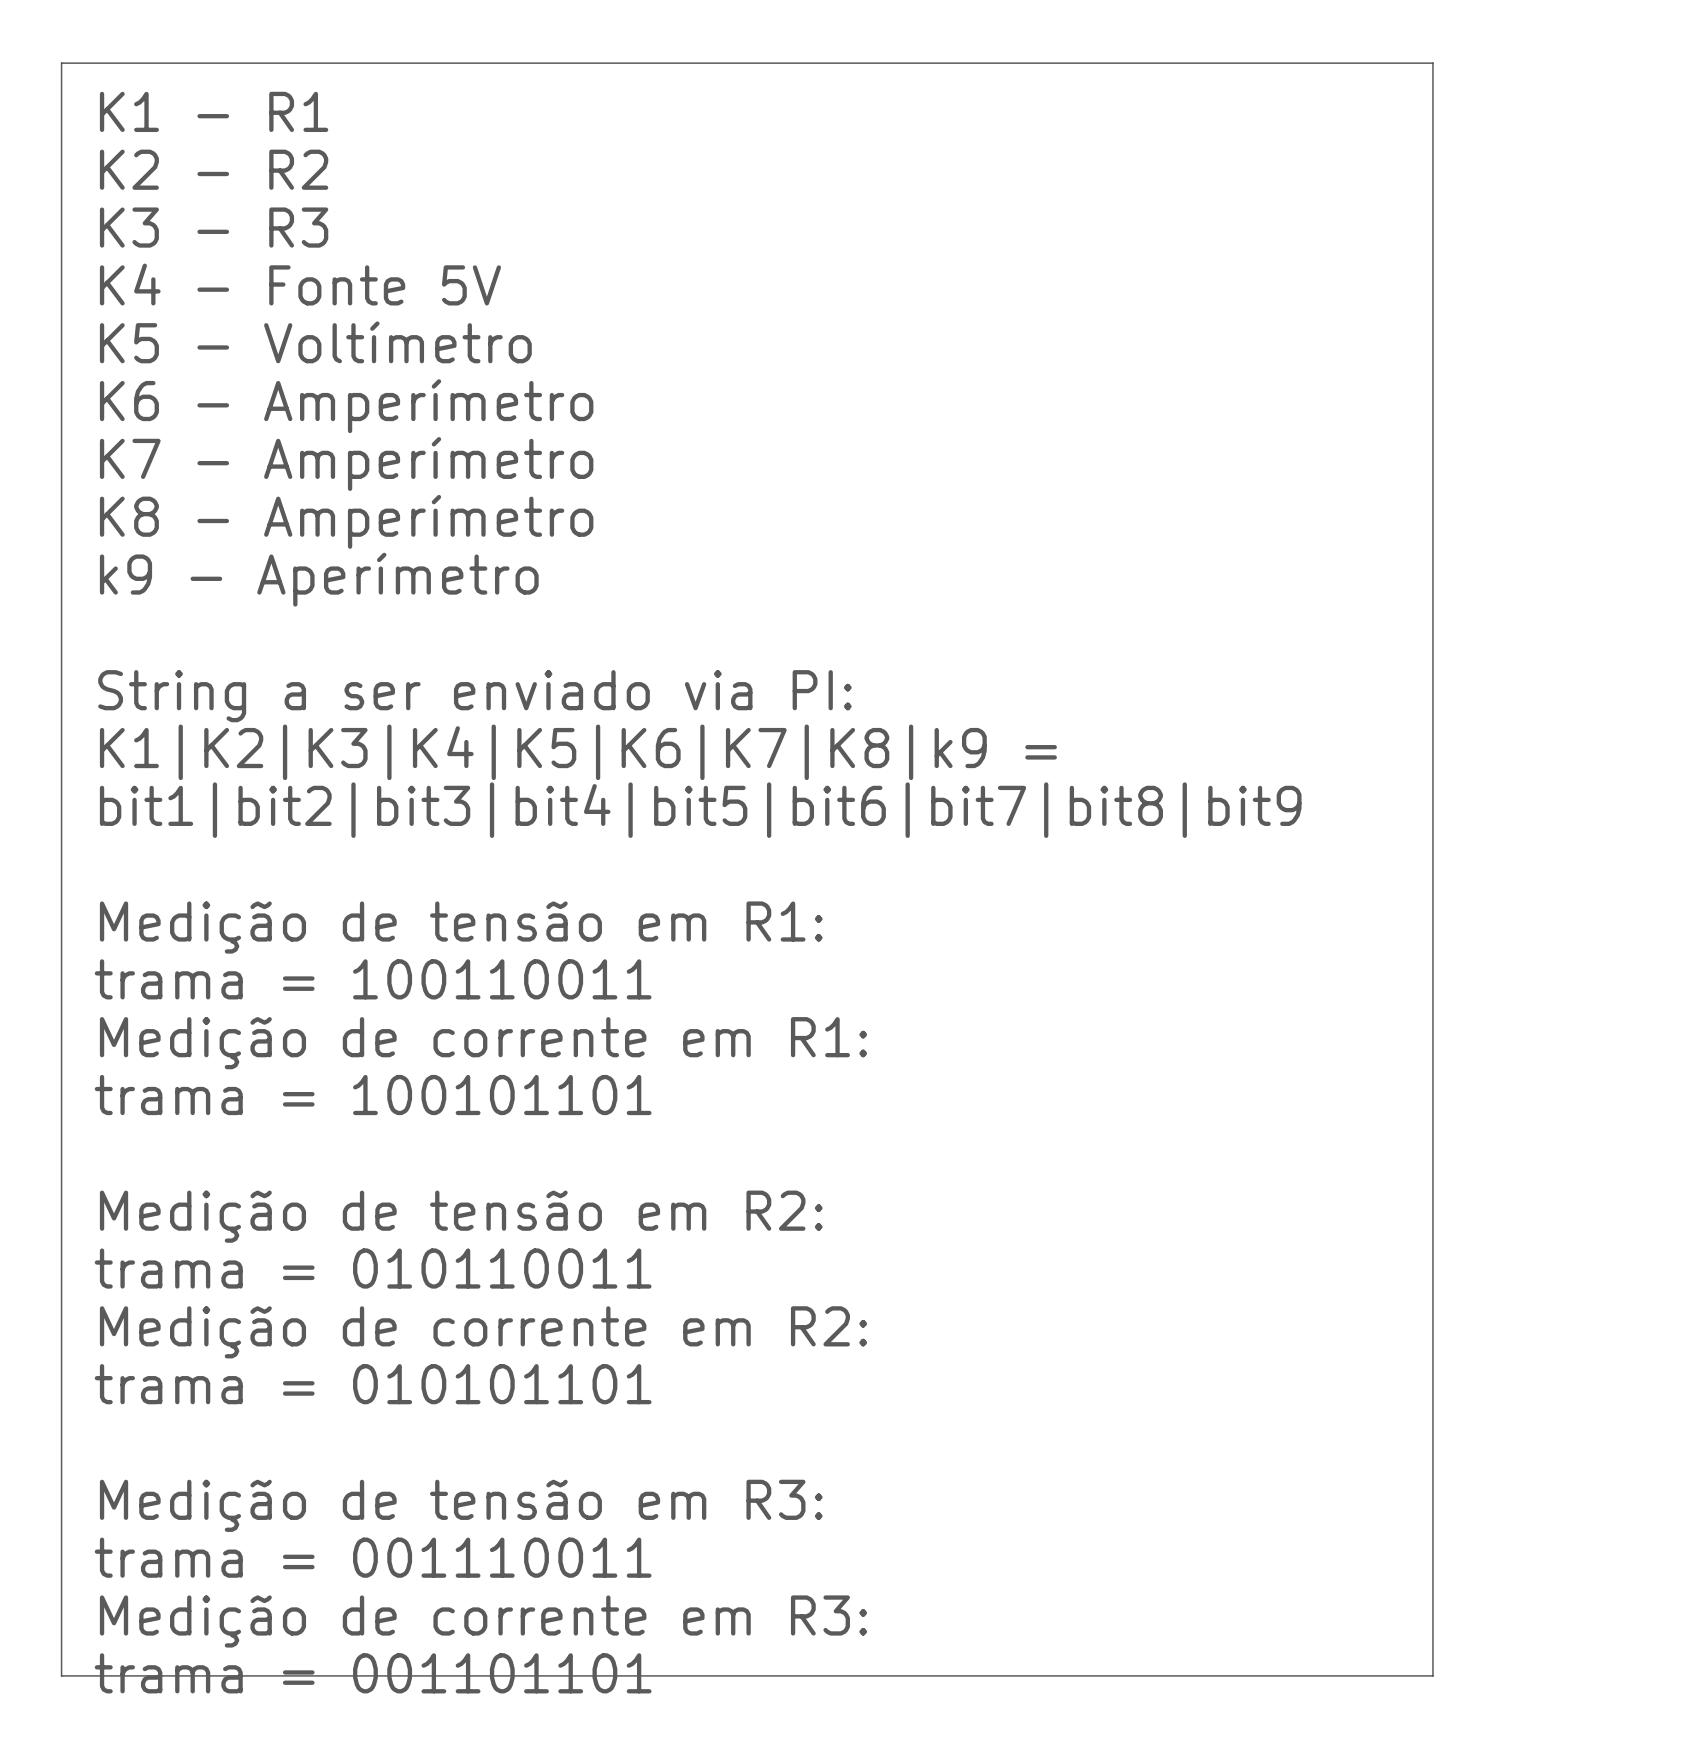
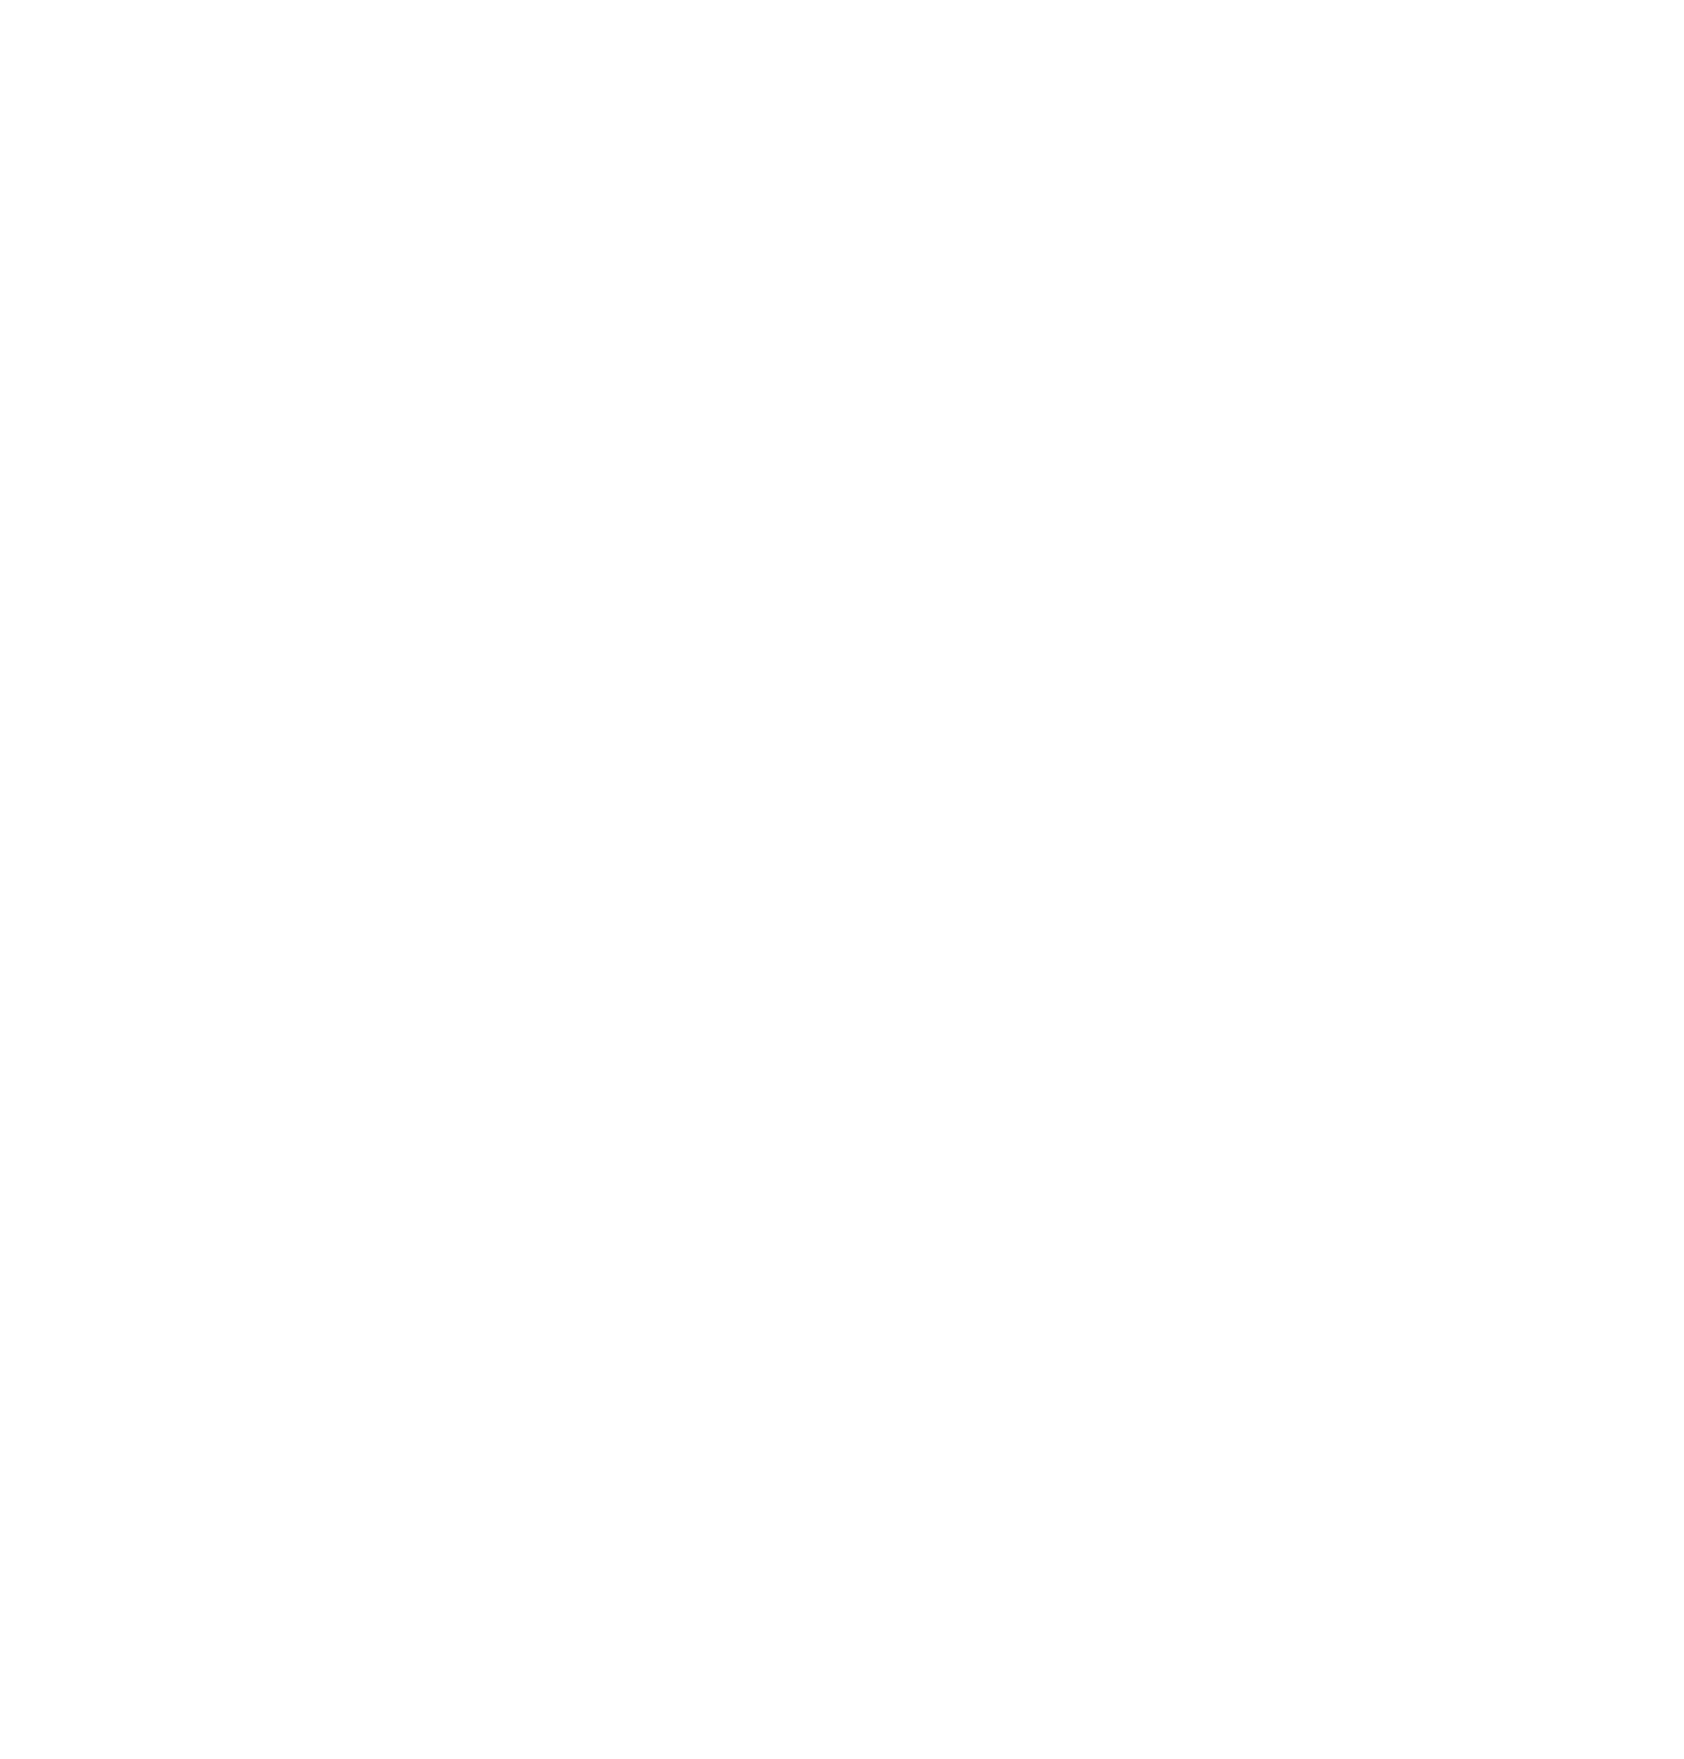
line: (61, 63) (1432, 63) (1432, 1675) (61, 1675) (61, 63) -> none
text: K1 - R1 (214, 111) -> none
text: K2 - R2 (214, 169) -> none
text: K3 - R3 (214, 227) -> none
text: K4 - Fonte 5V (300, 284) -> none
text: K5 - Voltímetro (315, 342) -> none
text: K6 - Amperímetro (346, 406) -> none
text: K7 - Amperímetro (346, 464) -> none
text: K8 - Amperímetro (346, 521) -> none
text: k9 - Aperímetro (319, 579) -> none
text: String a ser enviado via PI: (474, 696) -> none
text: K1|K2|K3|K4|K5|K6|K7|K8|k9 = (578, 752) -> none
text: bit1|bit2|bit3|bit4|bit5|bit6|bit7|bit8|bit9 (700, 810) -> none
text: Medição de tensão em R1: (461, 927) -> none
text: trama = 100110011 (373, 979) -> none
text: Medição de corrente em R1: (483, 1043) -> none
text: trama = 100101101 (373, 1095) -> none
text: Medição de tensão em R2: (461, 1216) -> none
text: trama = 010110011 (373, 1268) -> none
text: Medição de corrente em R2: (483, 1332) -> none
text: trama = 010101101 (373, 1384) -> none
text: Medição de tensão em R3: (461, 1505) -> none
text: trama = 001110011 (373, 1557) -> none
text: Medição de corrente em R3: (483, 1621) -> none
text: trama = 001101101 (373, 1673) -> none

